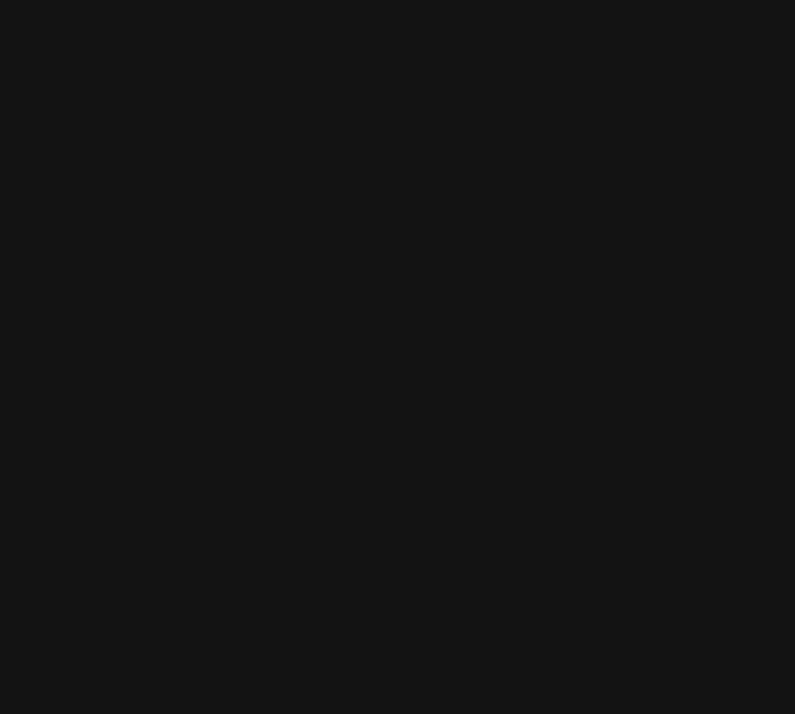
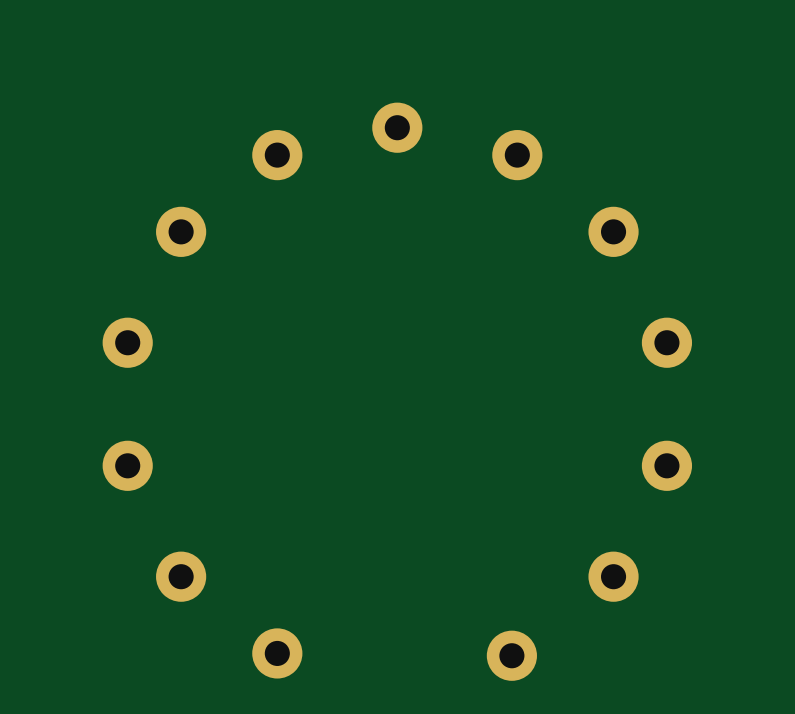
part: none -> (397, 391)

